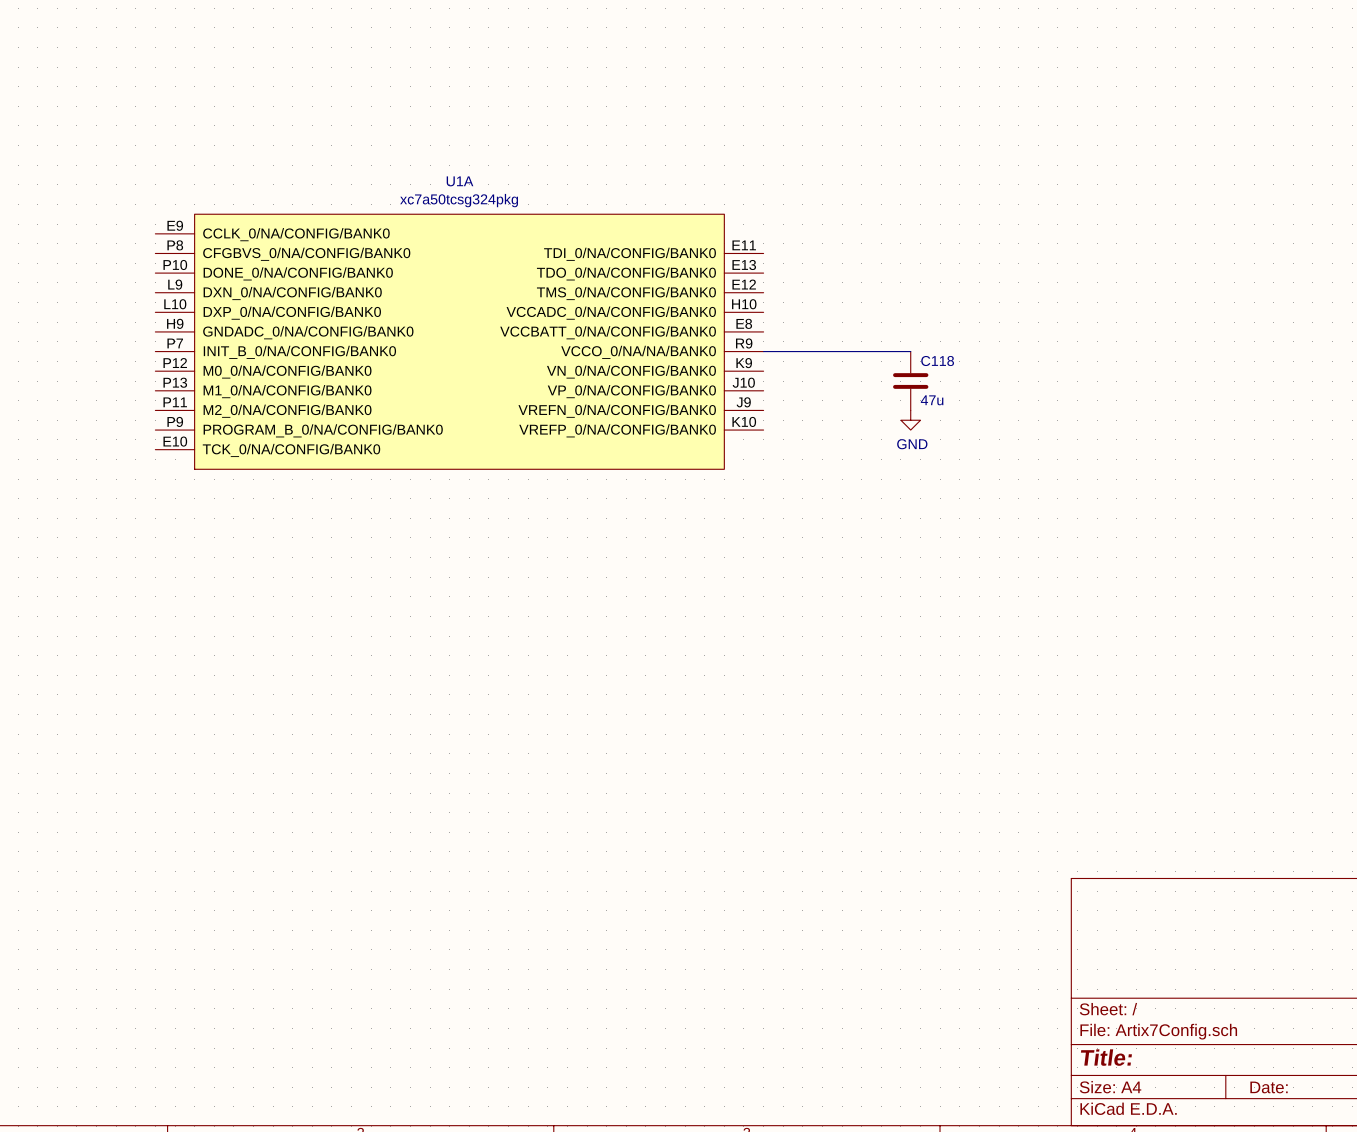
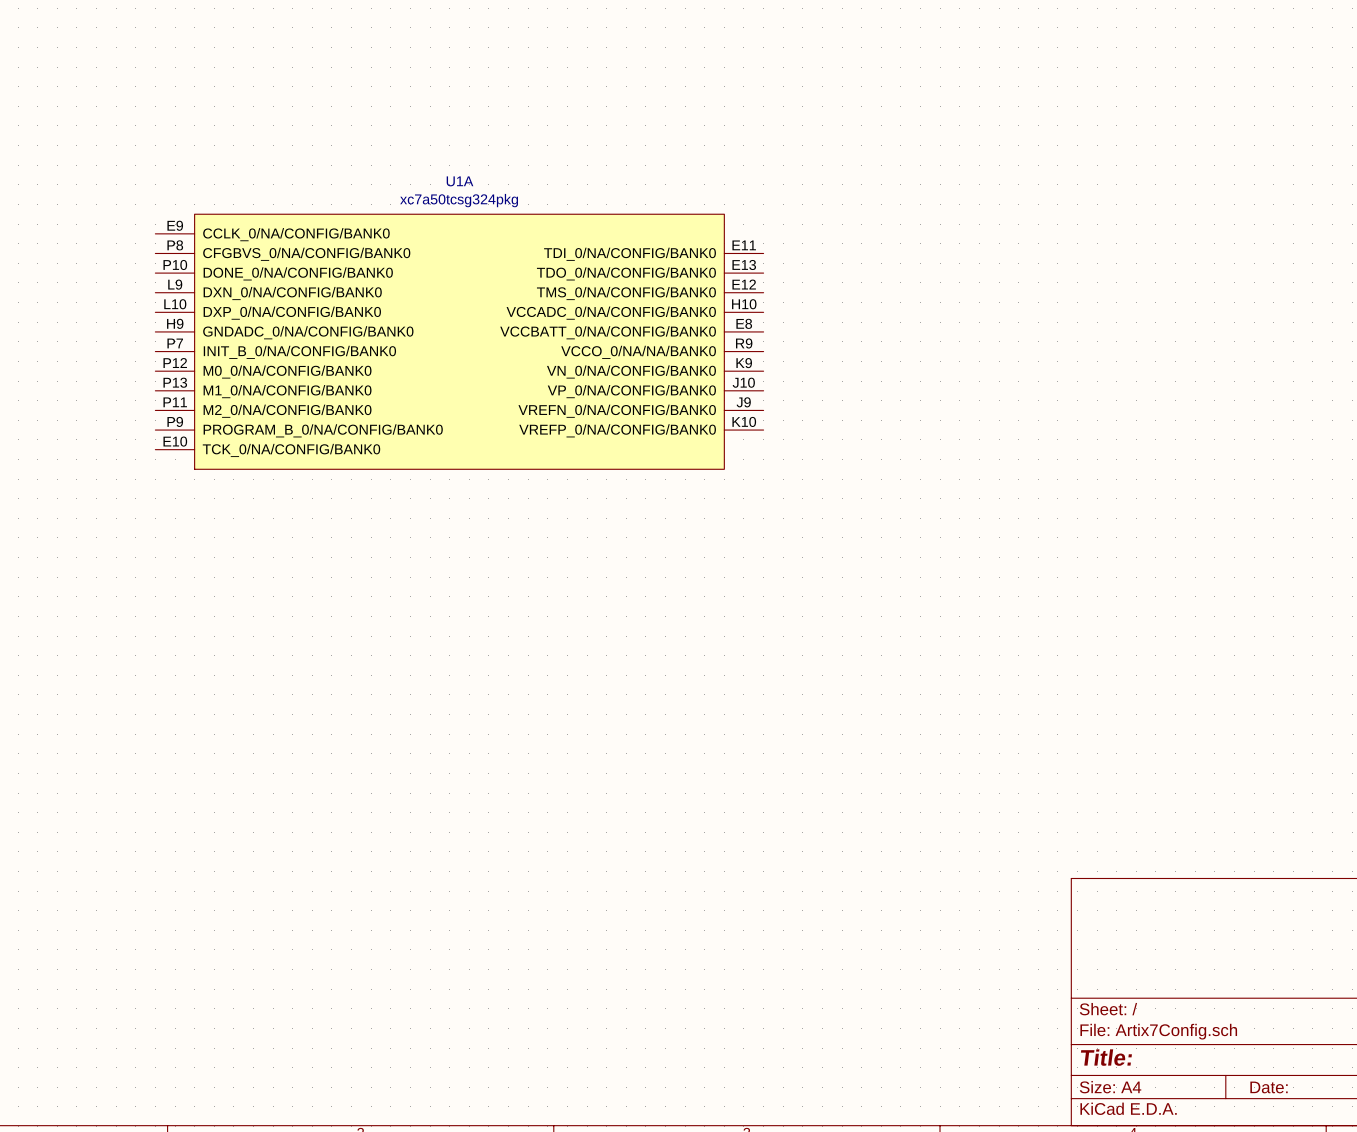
wire: (763, 351) (910, 351) -> none
C118: 47u (910, 381) -> none
power symbol: GND (910, 420) -> none

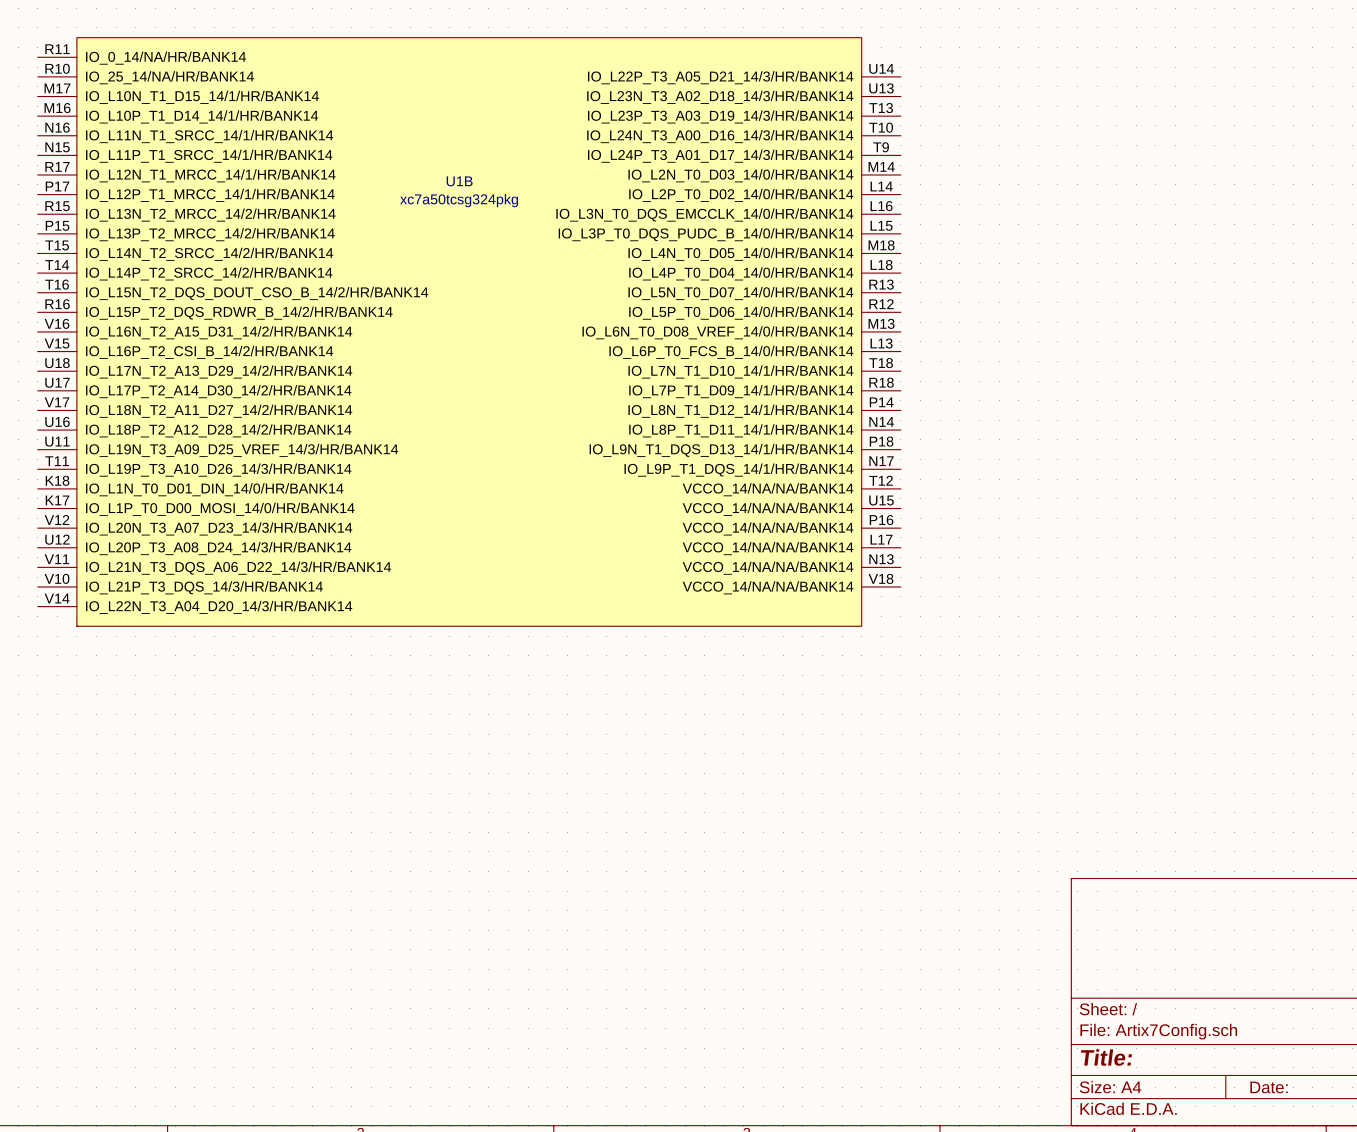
U1B: none -> xc7a50tcsg324pkg (469, 331)
U1A: xc7a50tcsg324pkg (459, 341) -> none

